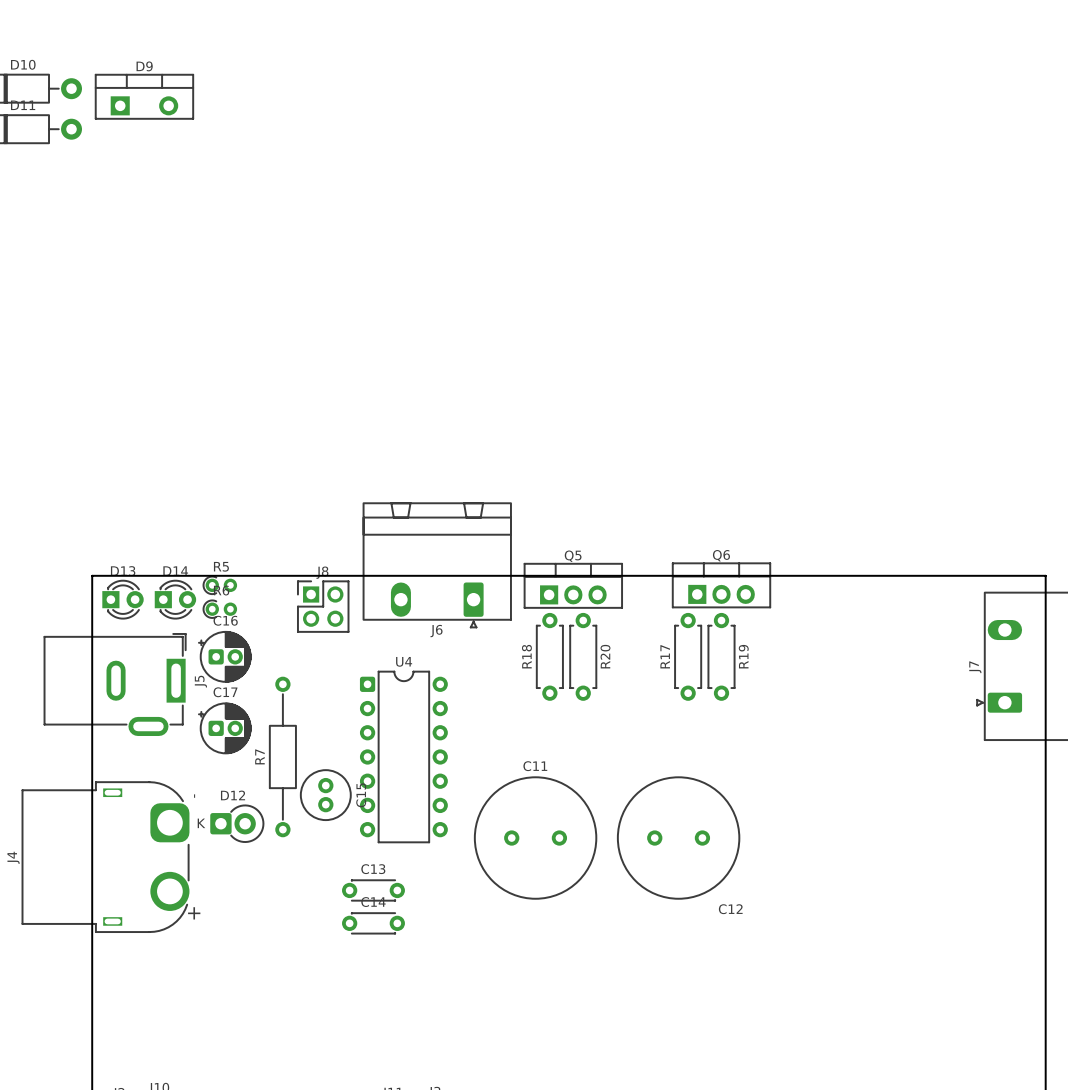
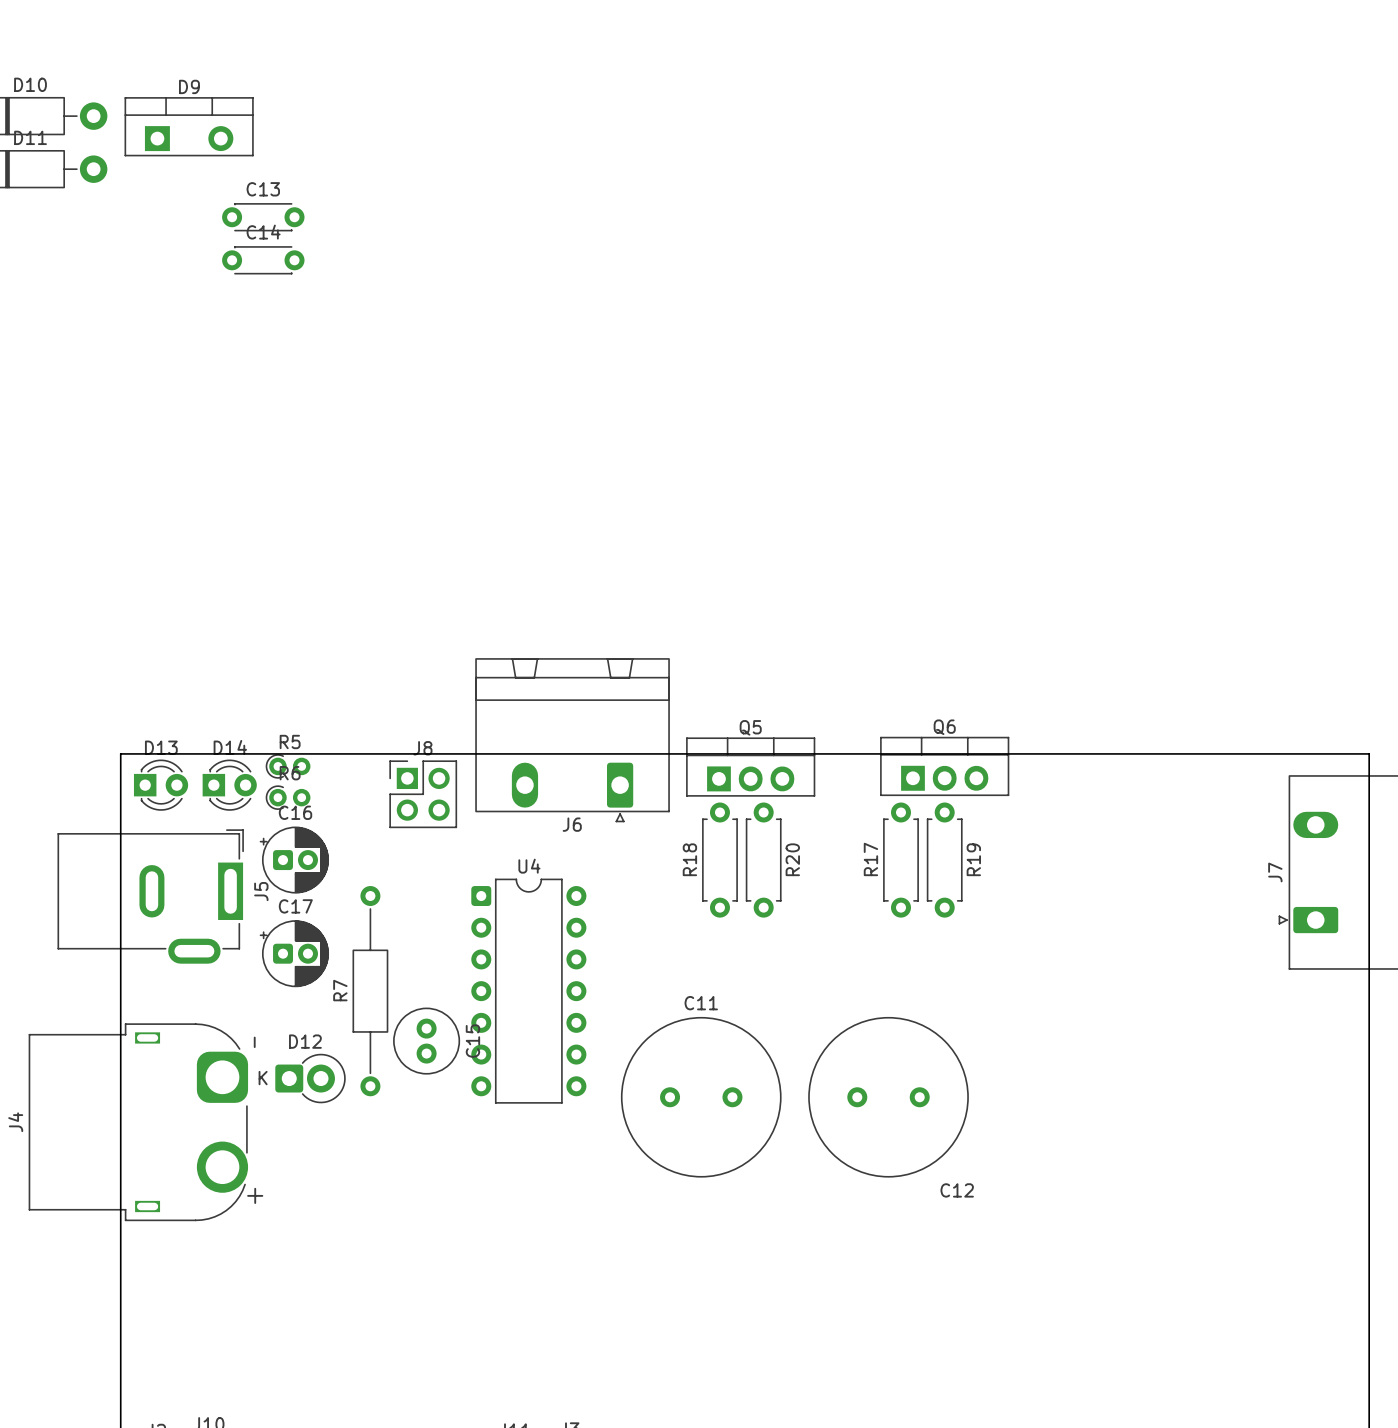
C13 position: (373, 890) -> (263, 217)
C14 position: (373, 923) -> (263, 260)

